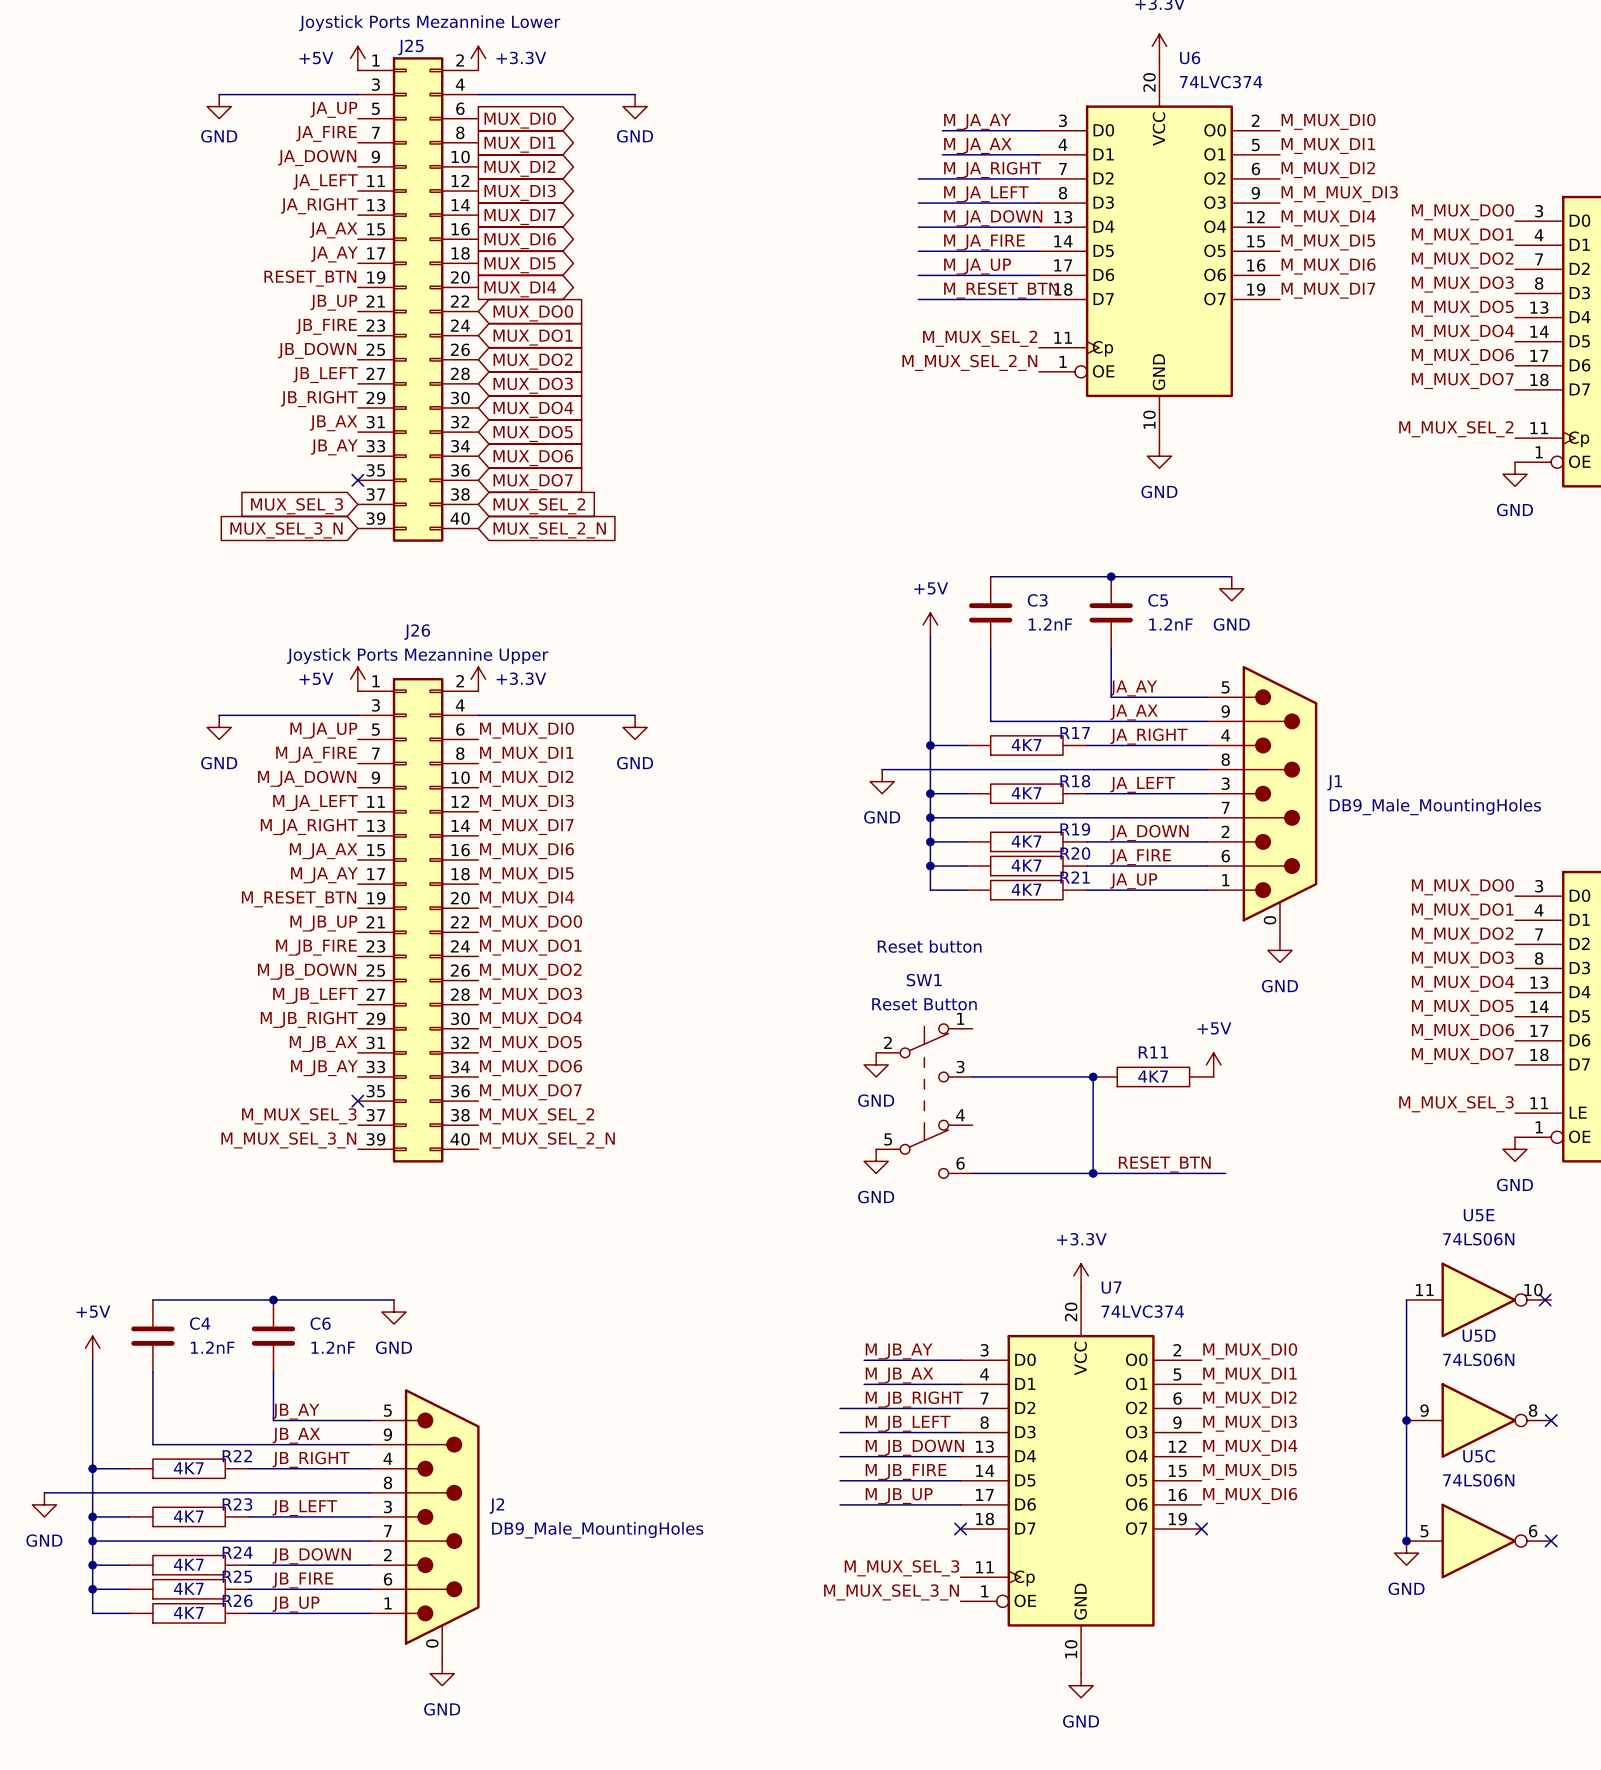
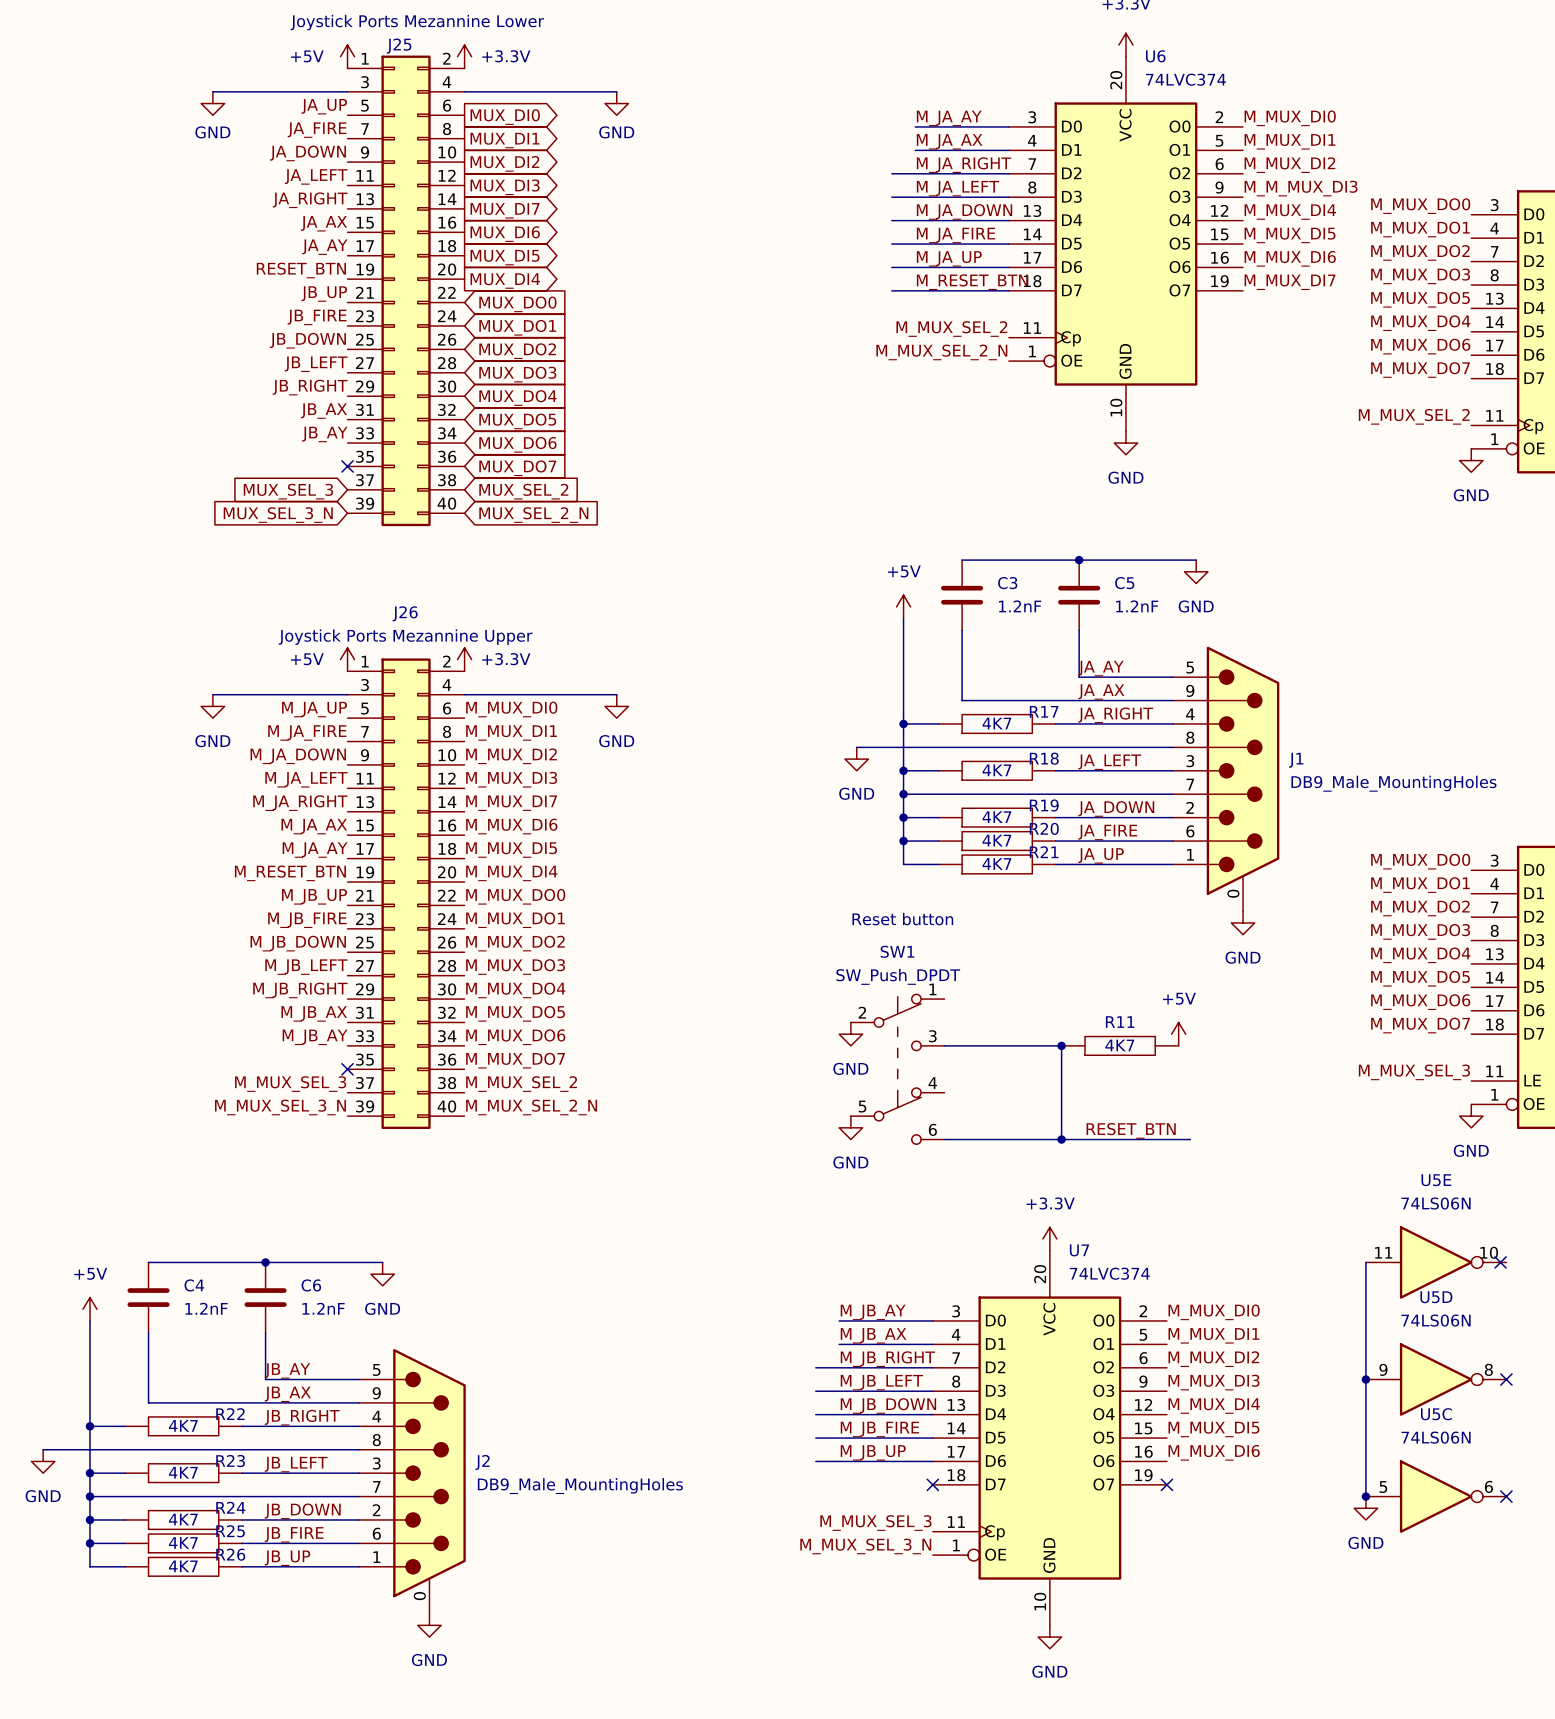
SW1 value: Reset Button (924, 1004) -> SW_Push_DPDT (898, 976)

